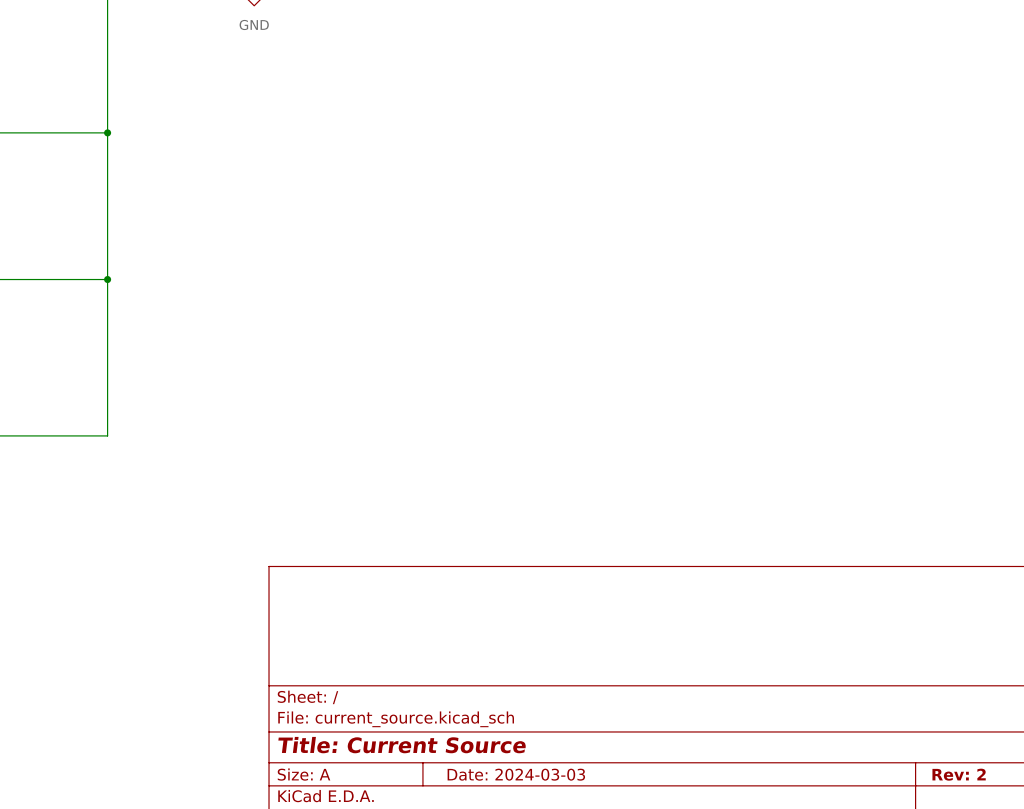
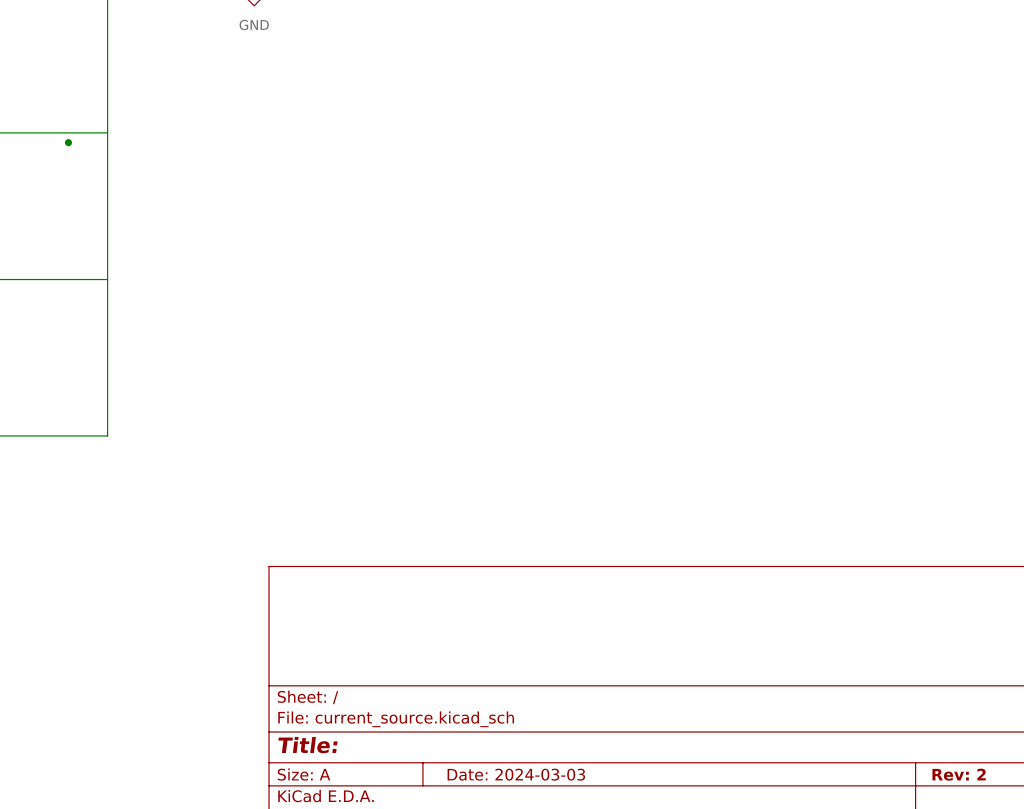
junction position: (107, 132) -> (68, 142)
junction: (107, 279) -> none
title block: Title: Current Source (402, 745) -> Title: (307, 745)

